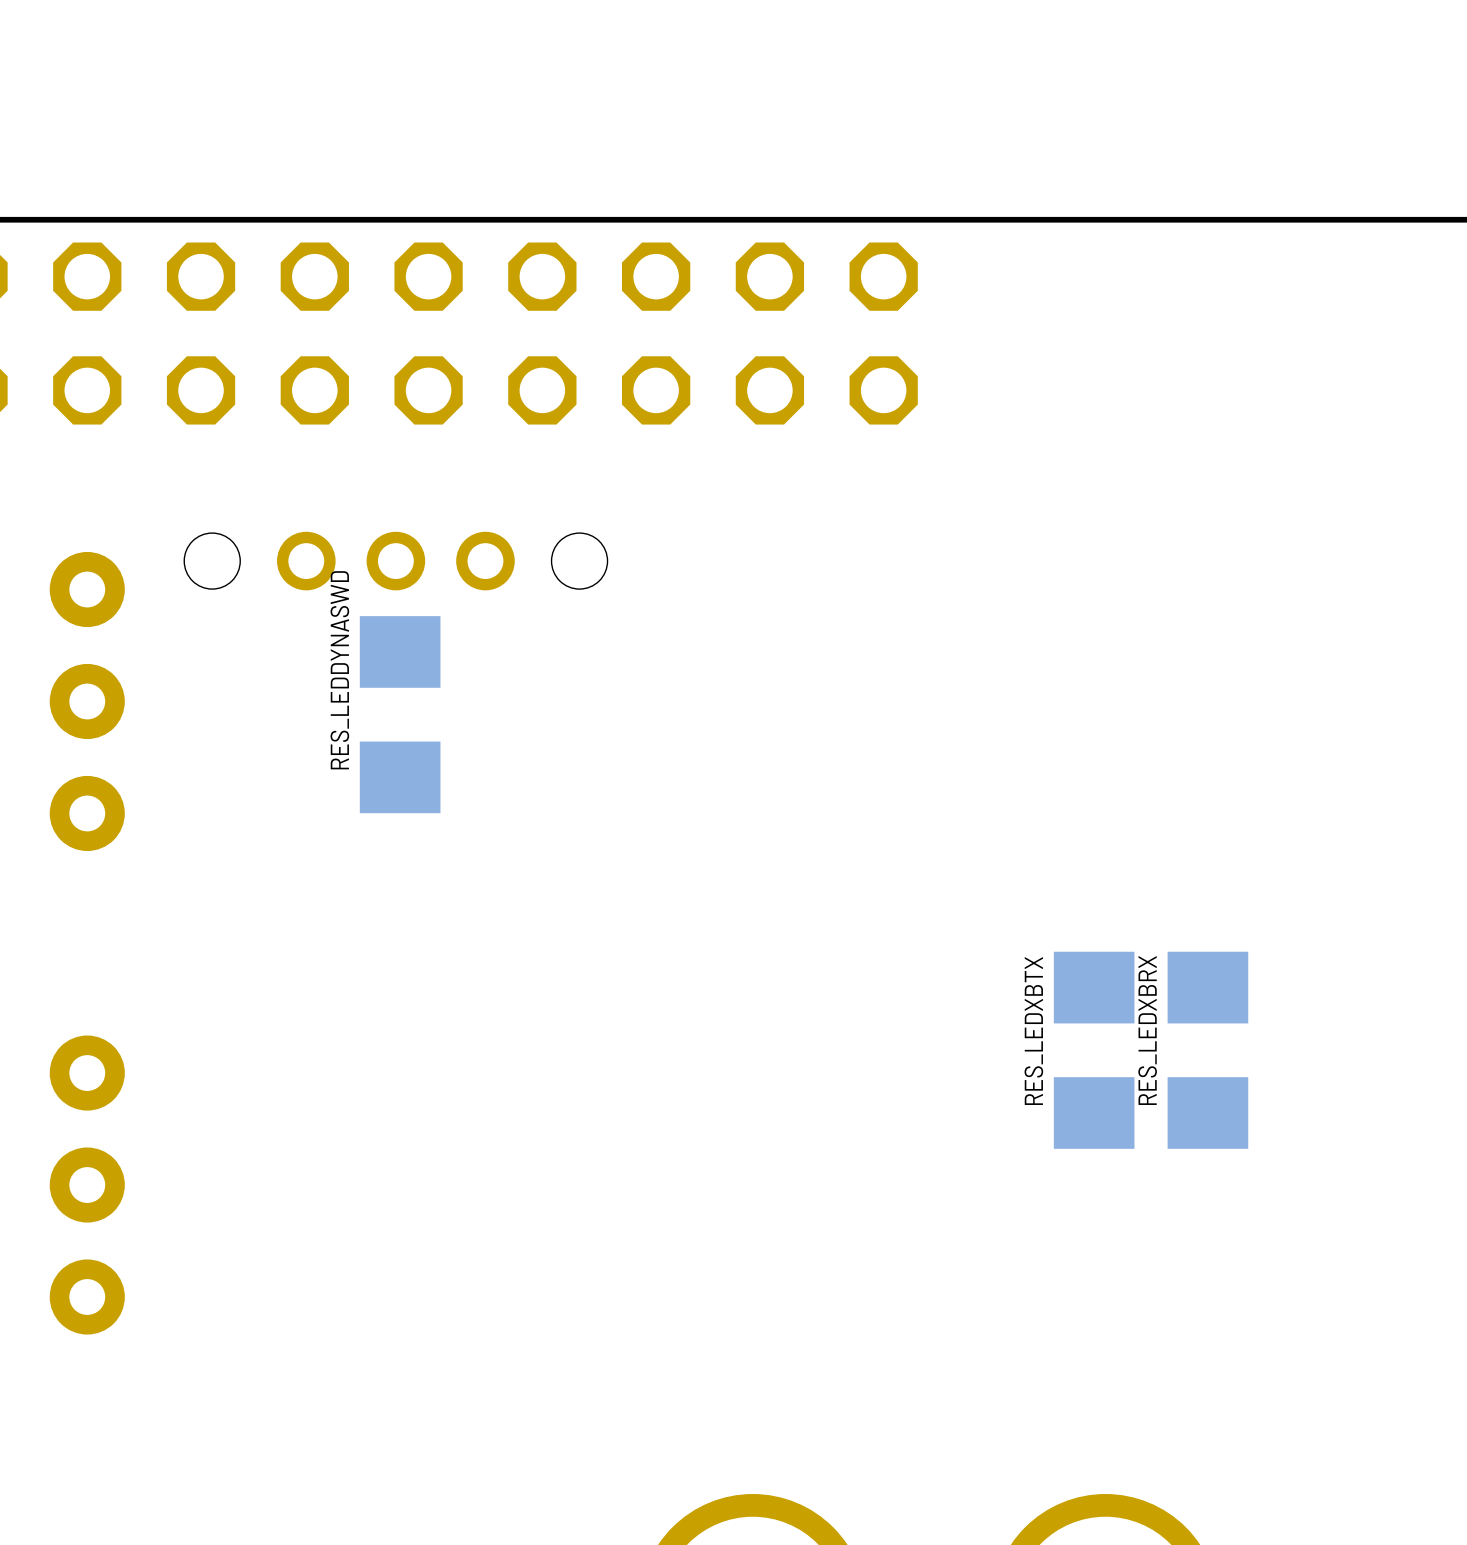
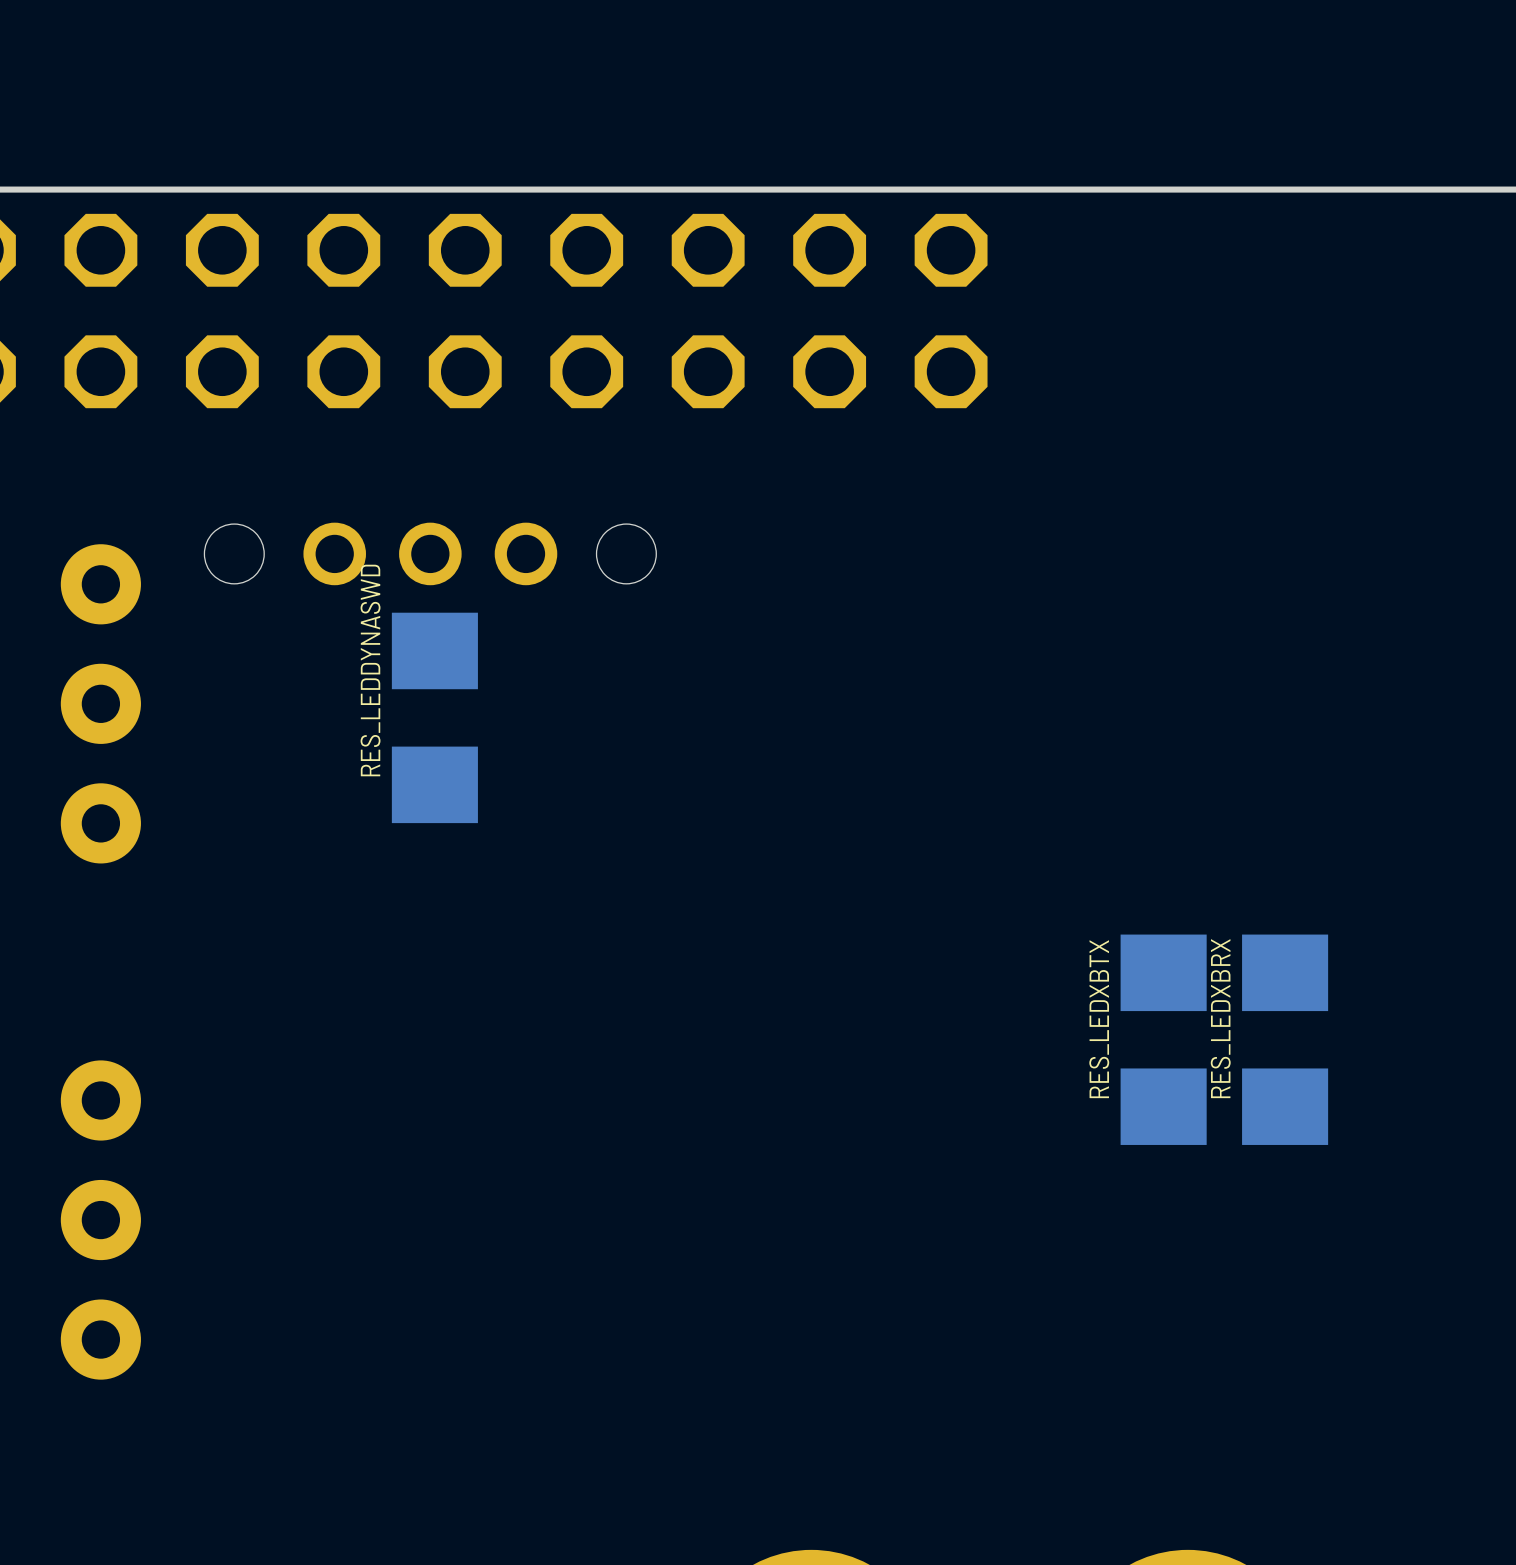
RES_LEDXBTX position: (1094, 1050) -> (1163, 1039)
RES_LEDXBRX position: (1207, 1050) -> (1285, 1039)

